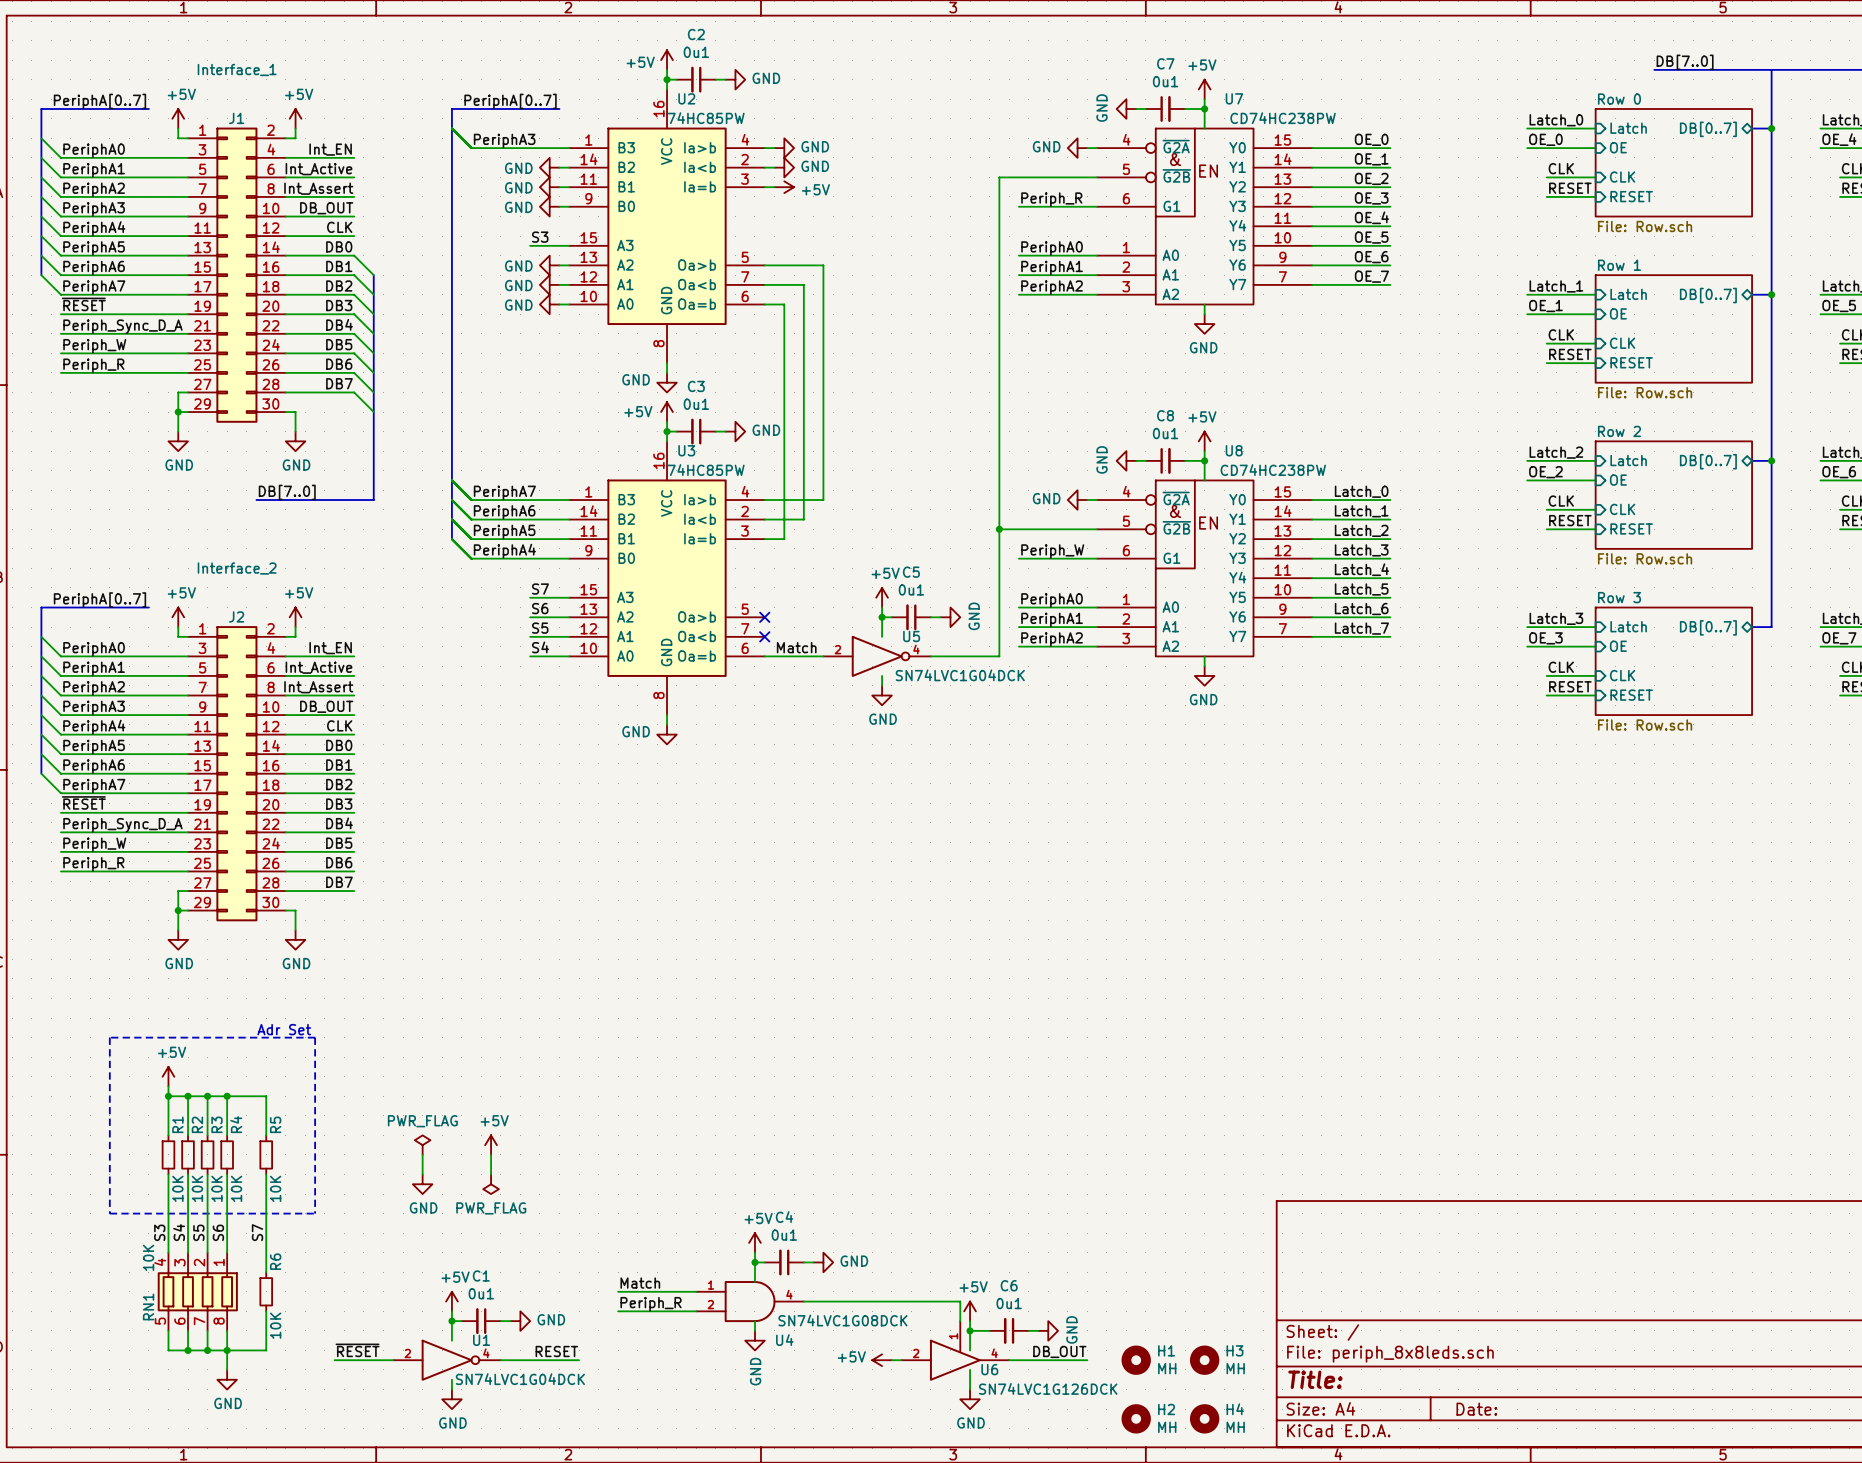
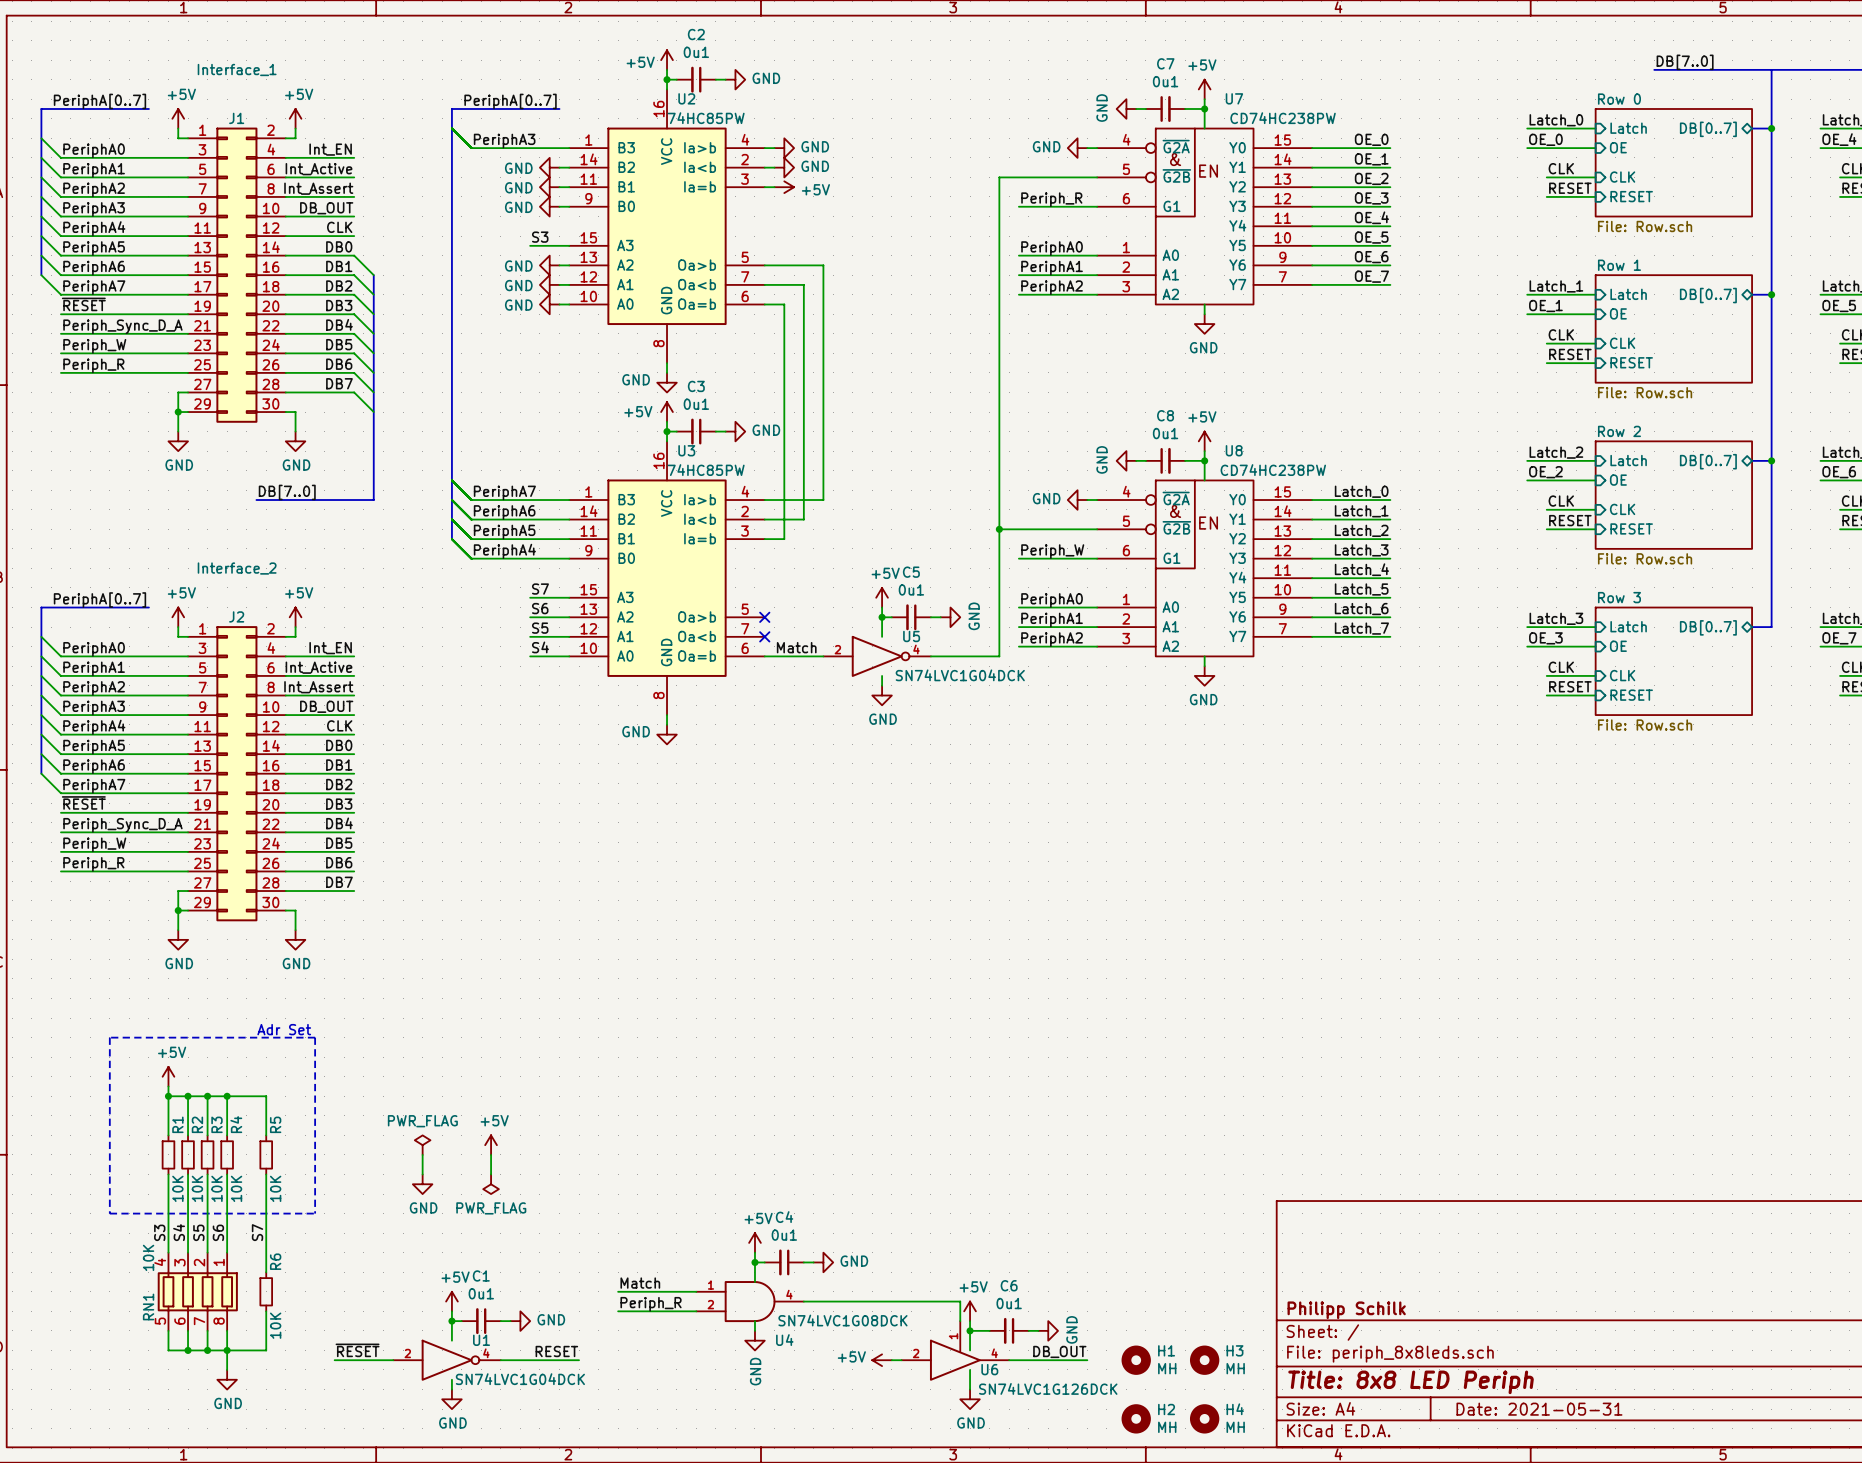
title block: none -> Philipp Schilk (1346, 1310)
title block: Title: (1315, 1379) -> Title: 8x8 LED Periph (1411, 1382)
title block: Date: (1476, 1409) -> Date: 2021-05-31 (1539, 1409)

